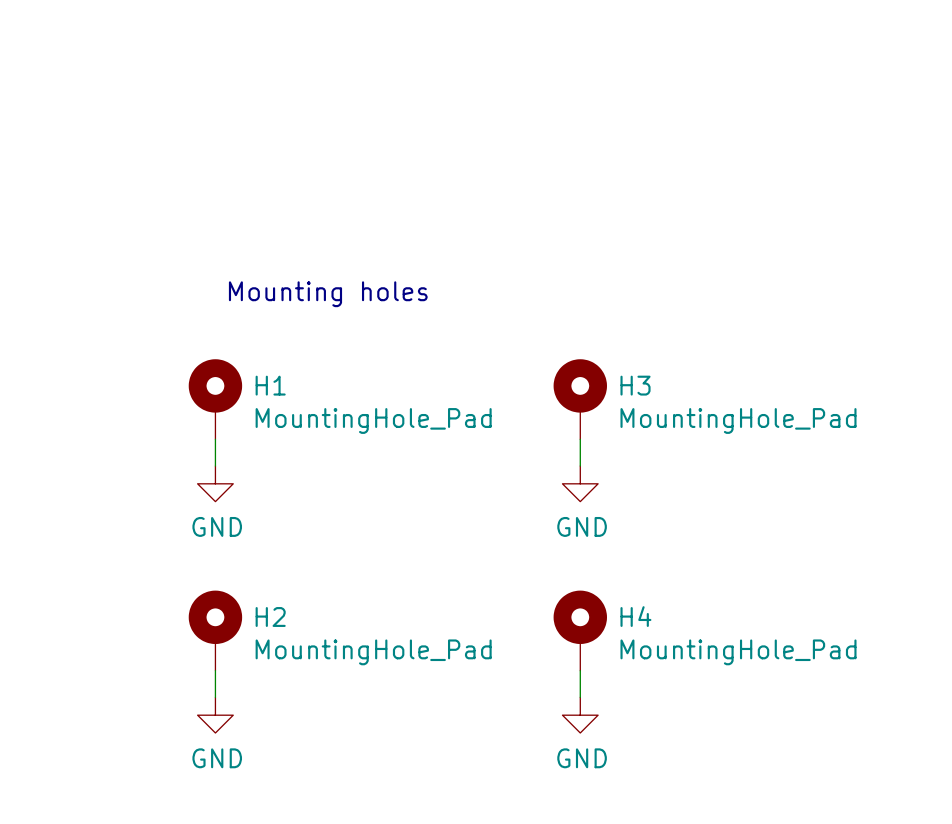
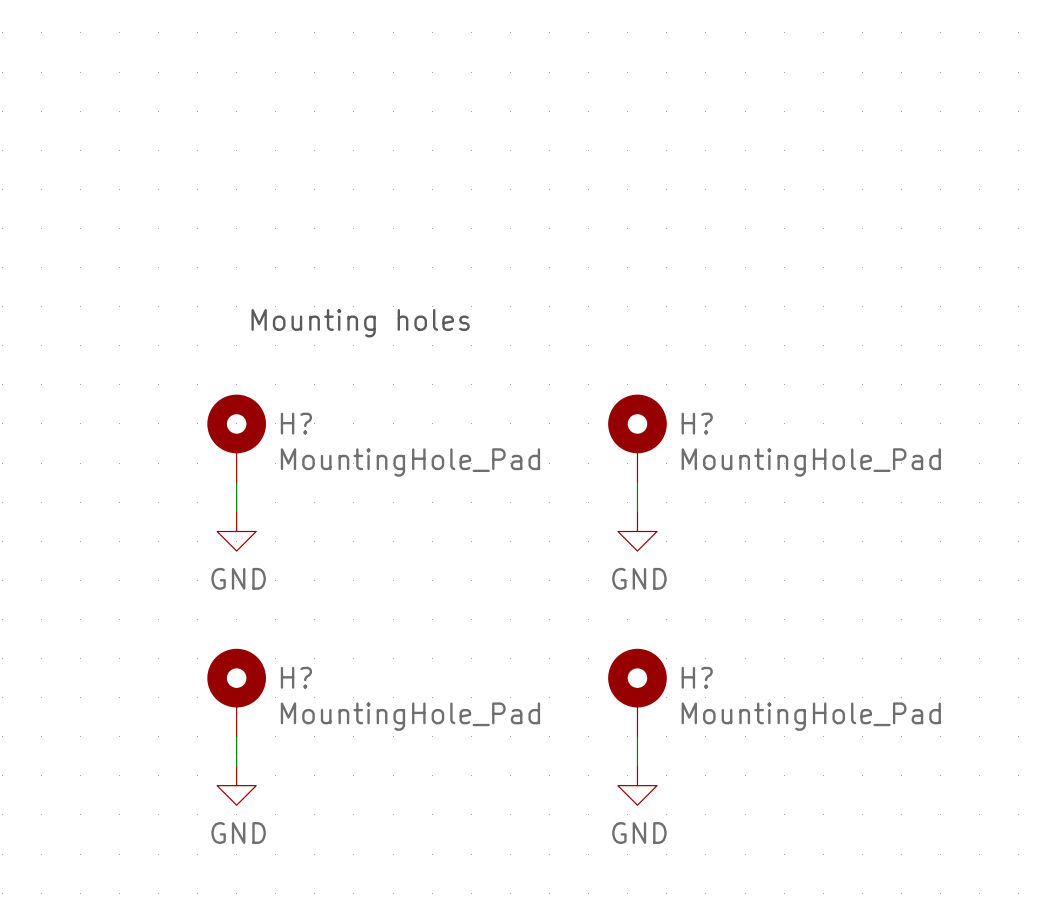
H1 name: H1 (270, 385) -> H? (296, 423)
H3 name: H3 (635, 385) -> H? (697, 423)
H2 name: H2 (270, 616) -> H? (296, 677)
H4 name: H4 (635, 616) -> H? (697, 677)

